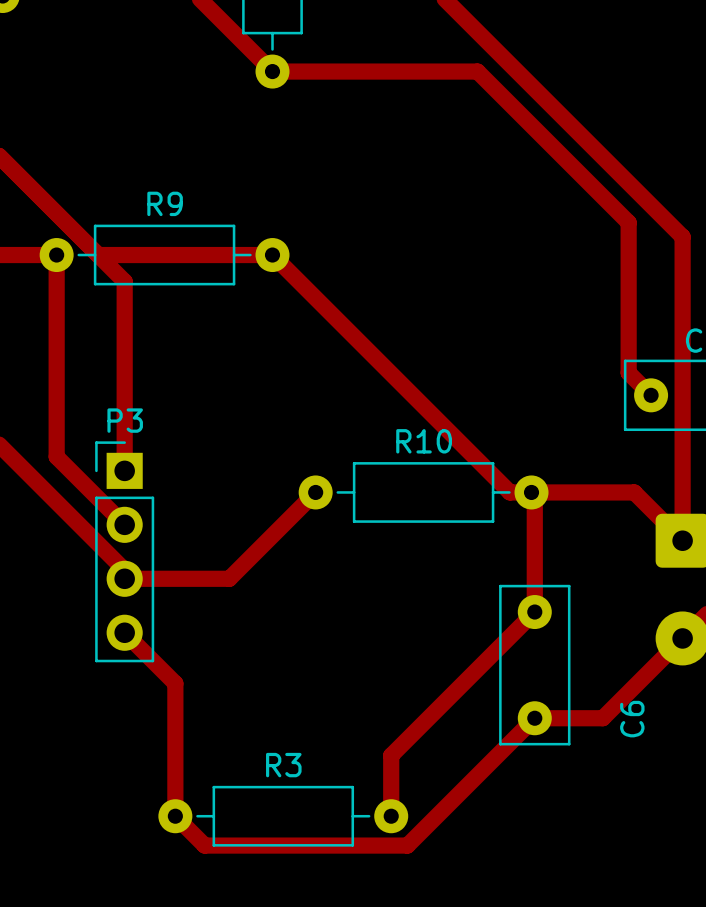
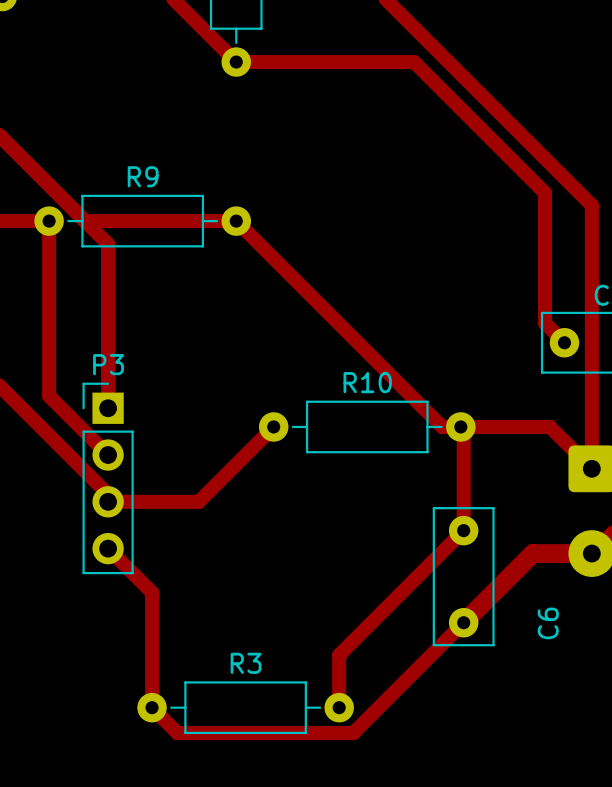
track: (682, 638) (602, 718) (534, 718) -> (591, 553) (532, 553) (463, 622)

